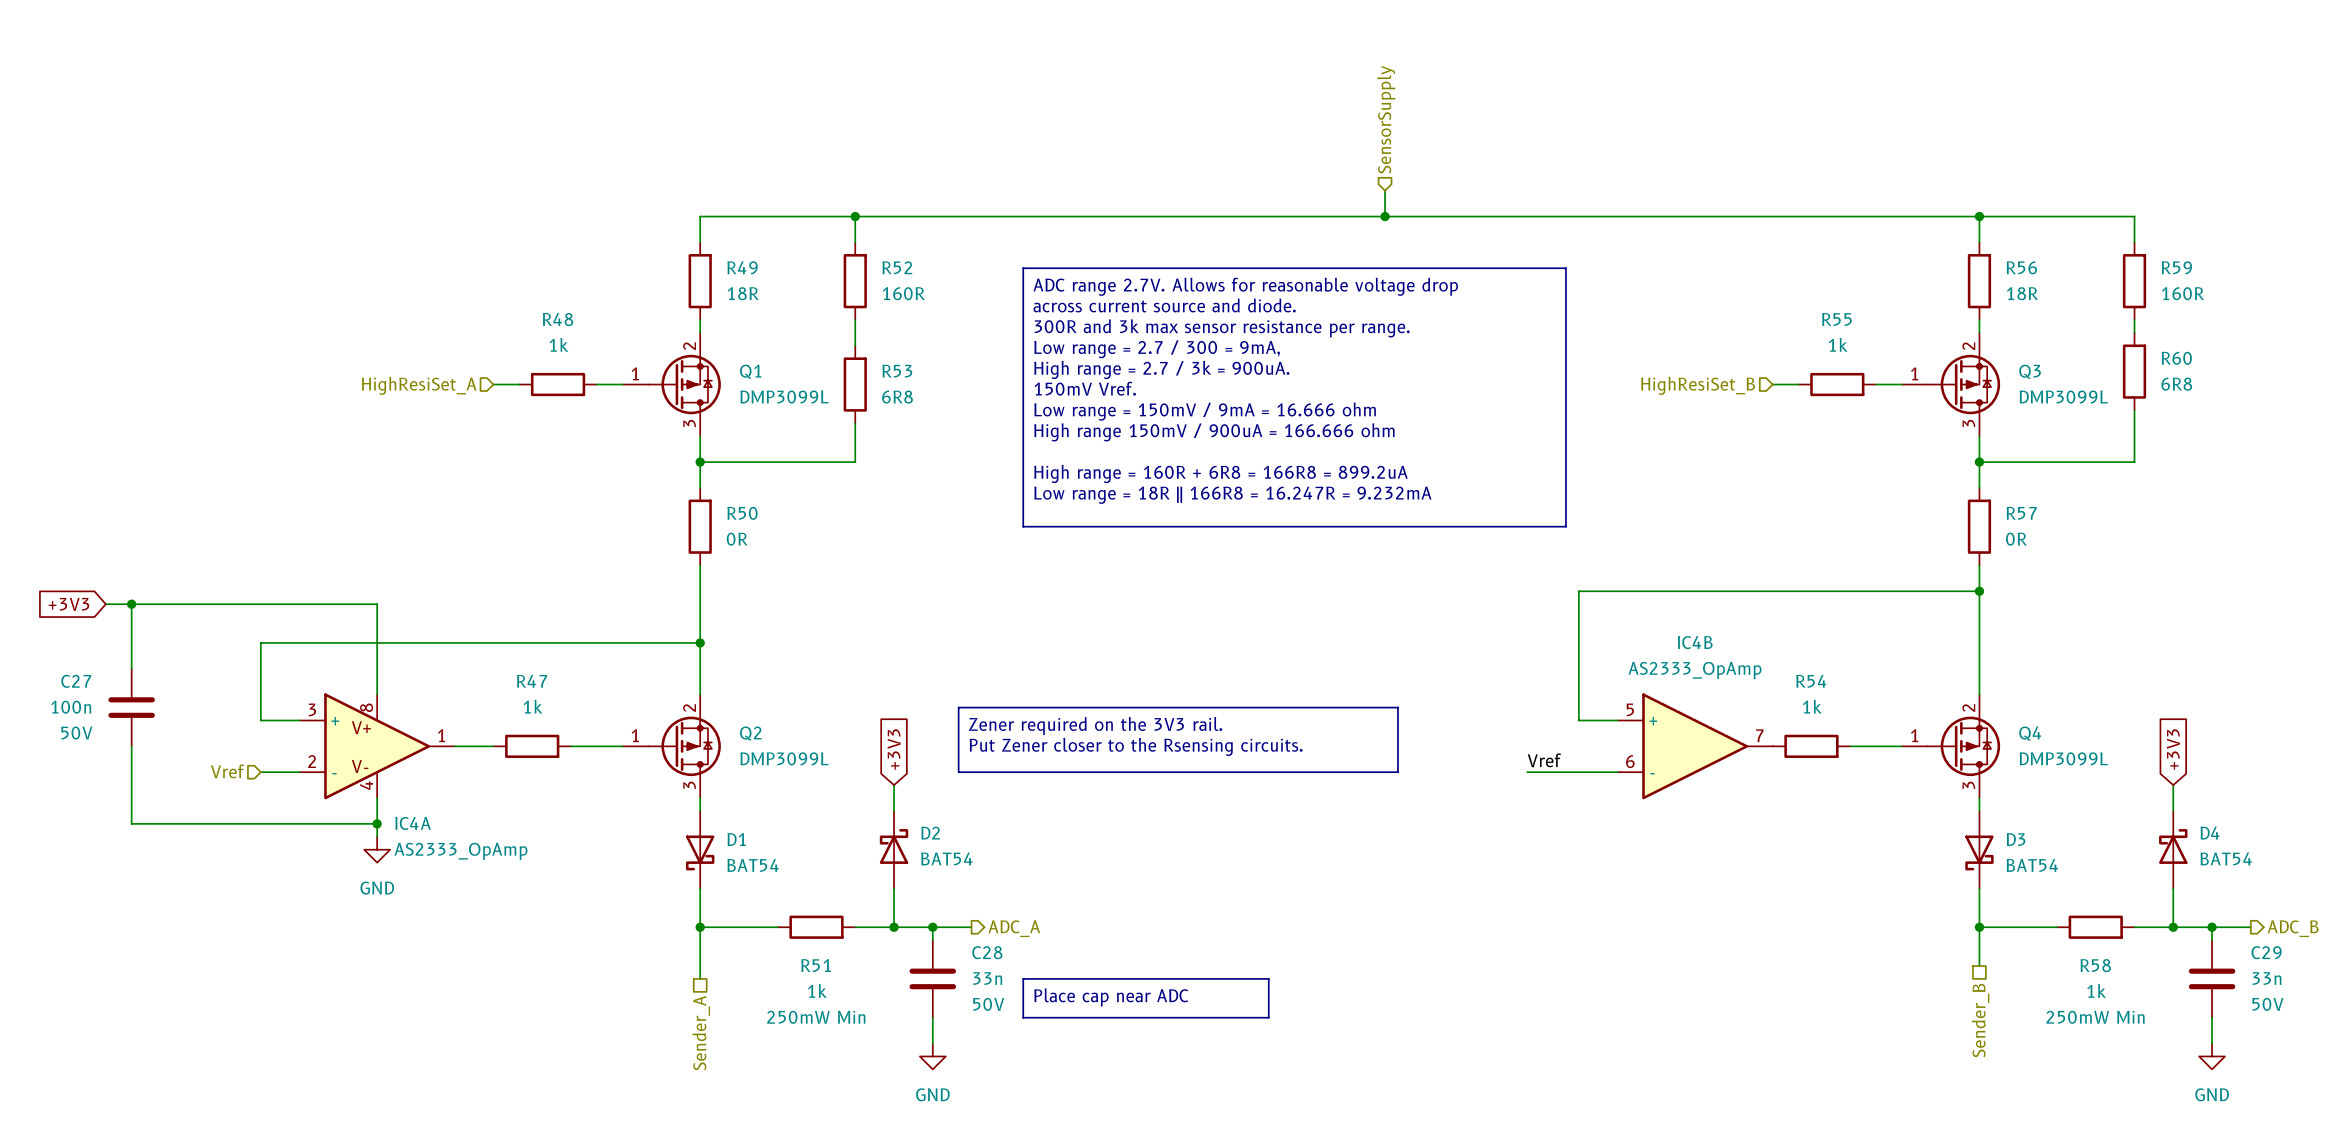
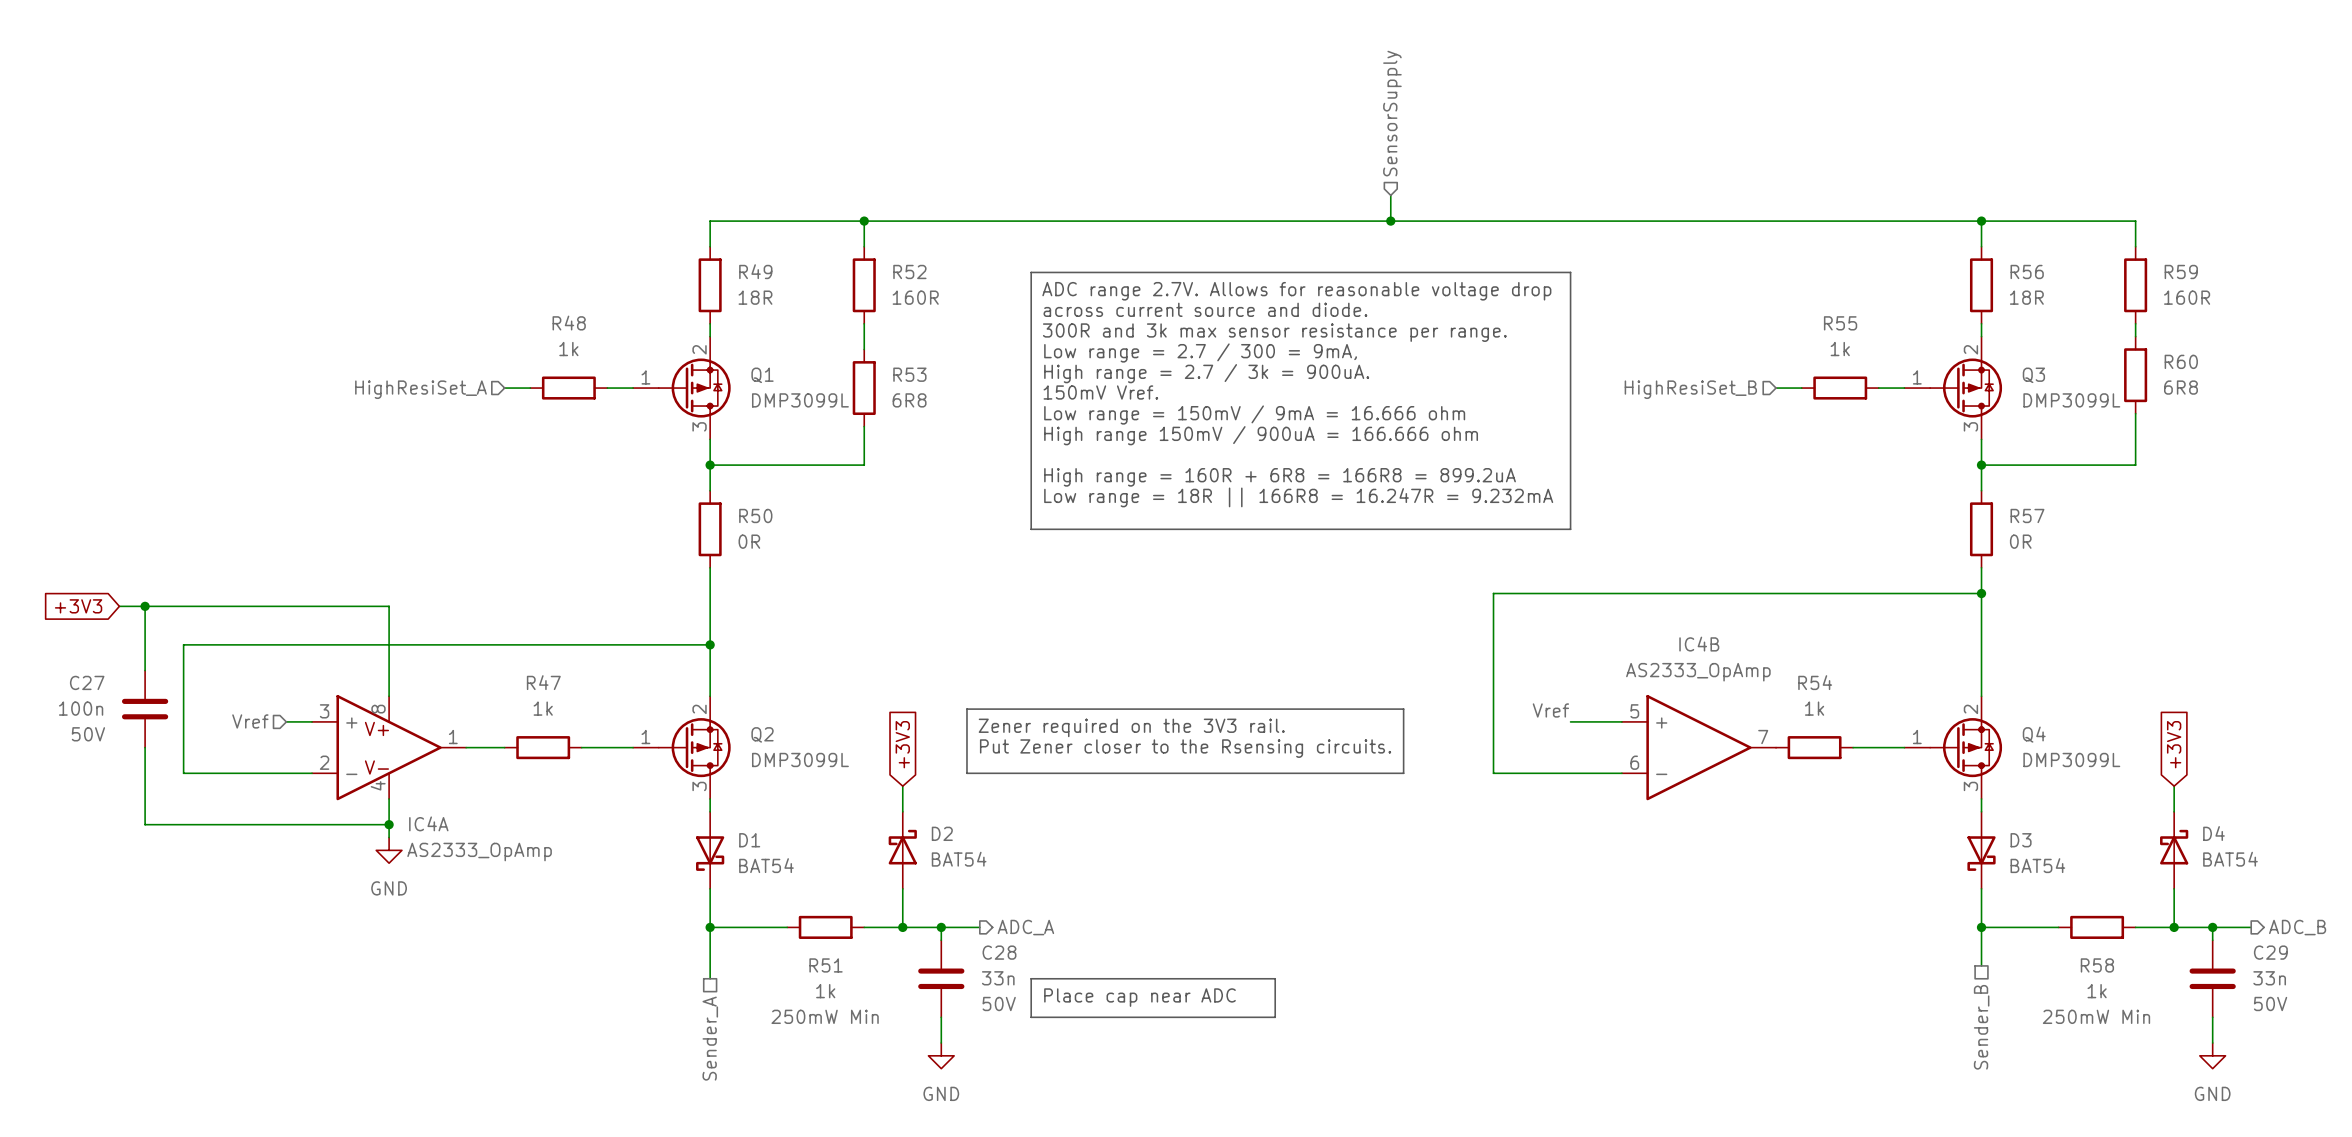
wire: (1578, 591) (1578, 720) -> (1583, 593) (1493, 593) (1493, 773) (1532, 773)
wire: (260, 642) (260, 720) (273, 720) -> (273, 644) (183, 644) (183, 773) (273, 773)
wire: none -> (1570, 721) (1583, 721)
label position: Vref (1544, 760) -> Vref (1550, 710)
hierarchical label position: Vref (227, 771) -> Vref (250, 721)

